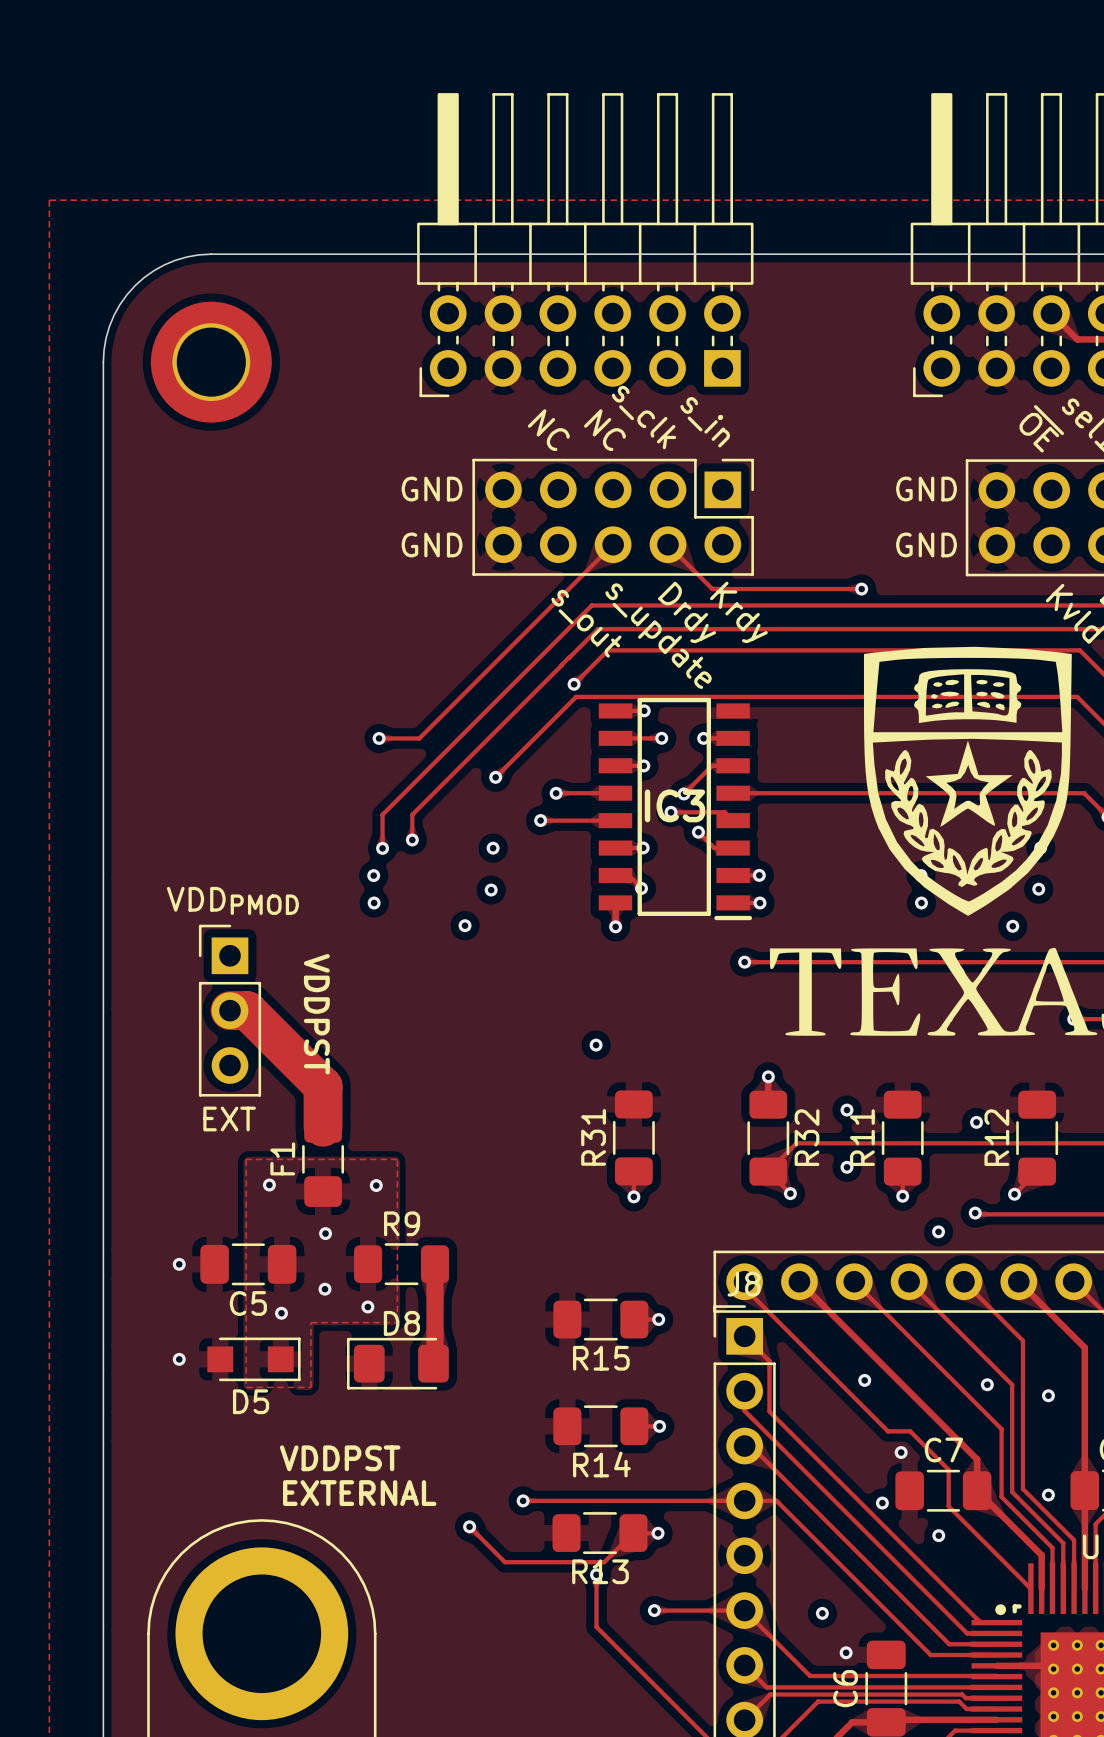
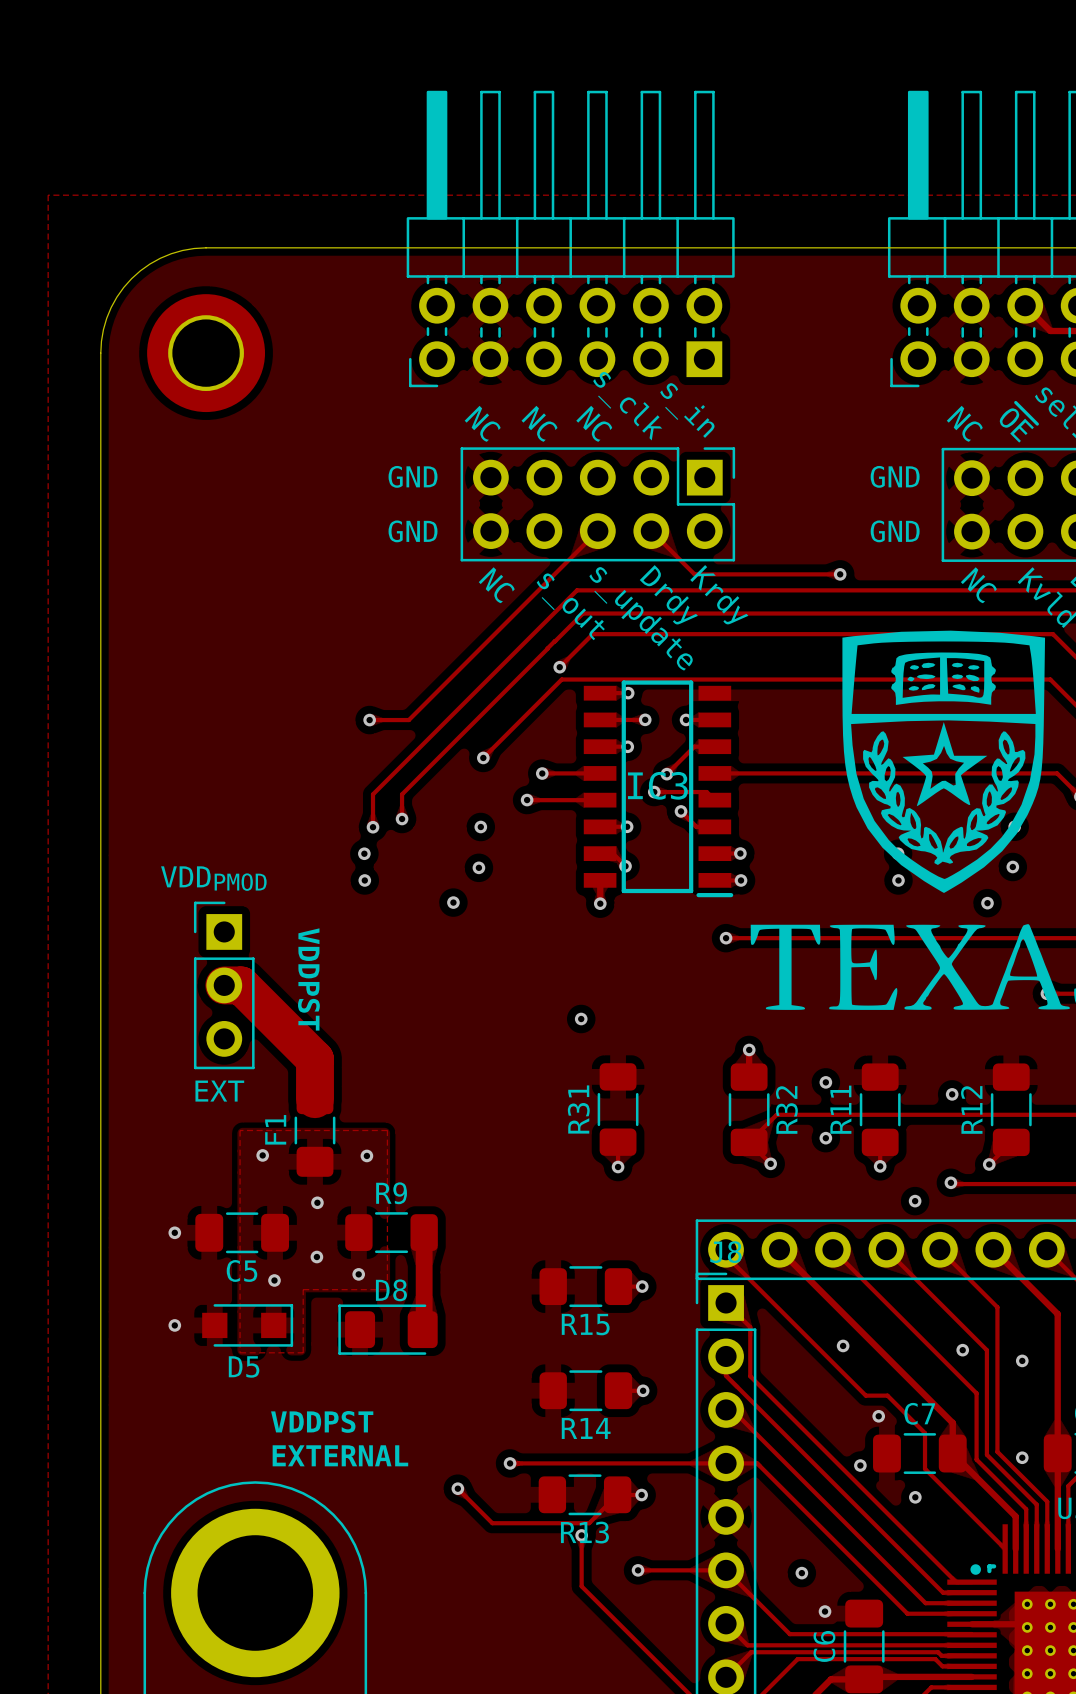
text: none -> NC (482, 423)
text: none -> NC (964, 423)
text: none -> NC (496, 585)
text: none -> NC (978, 585)

